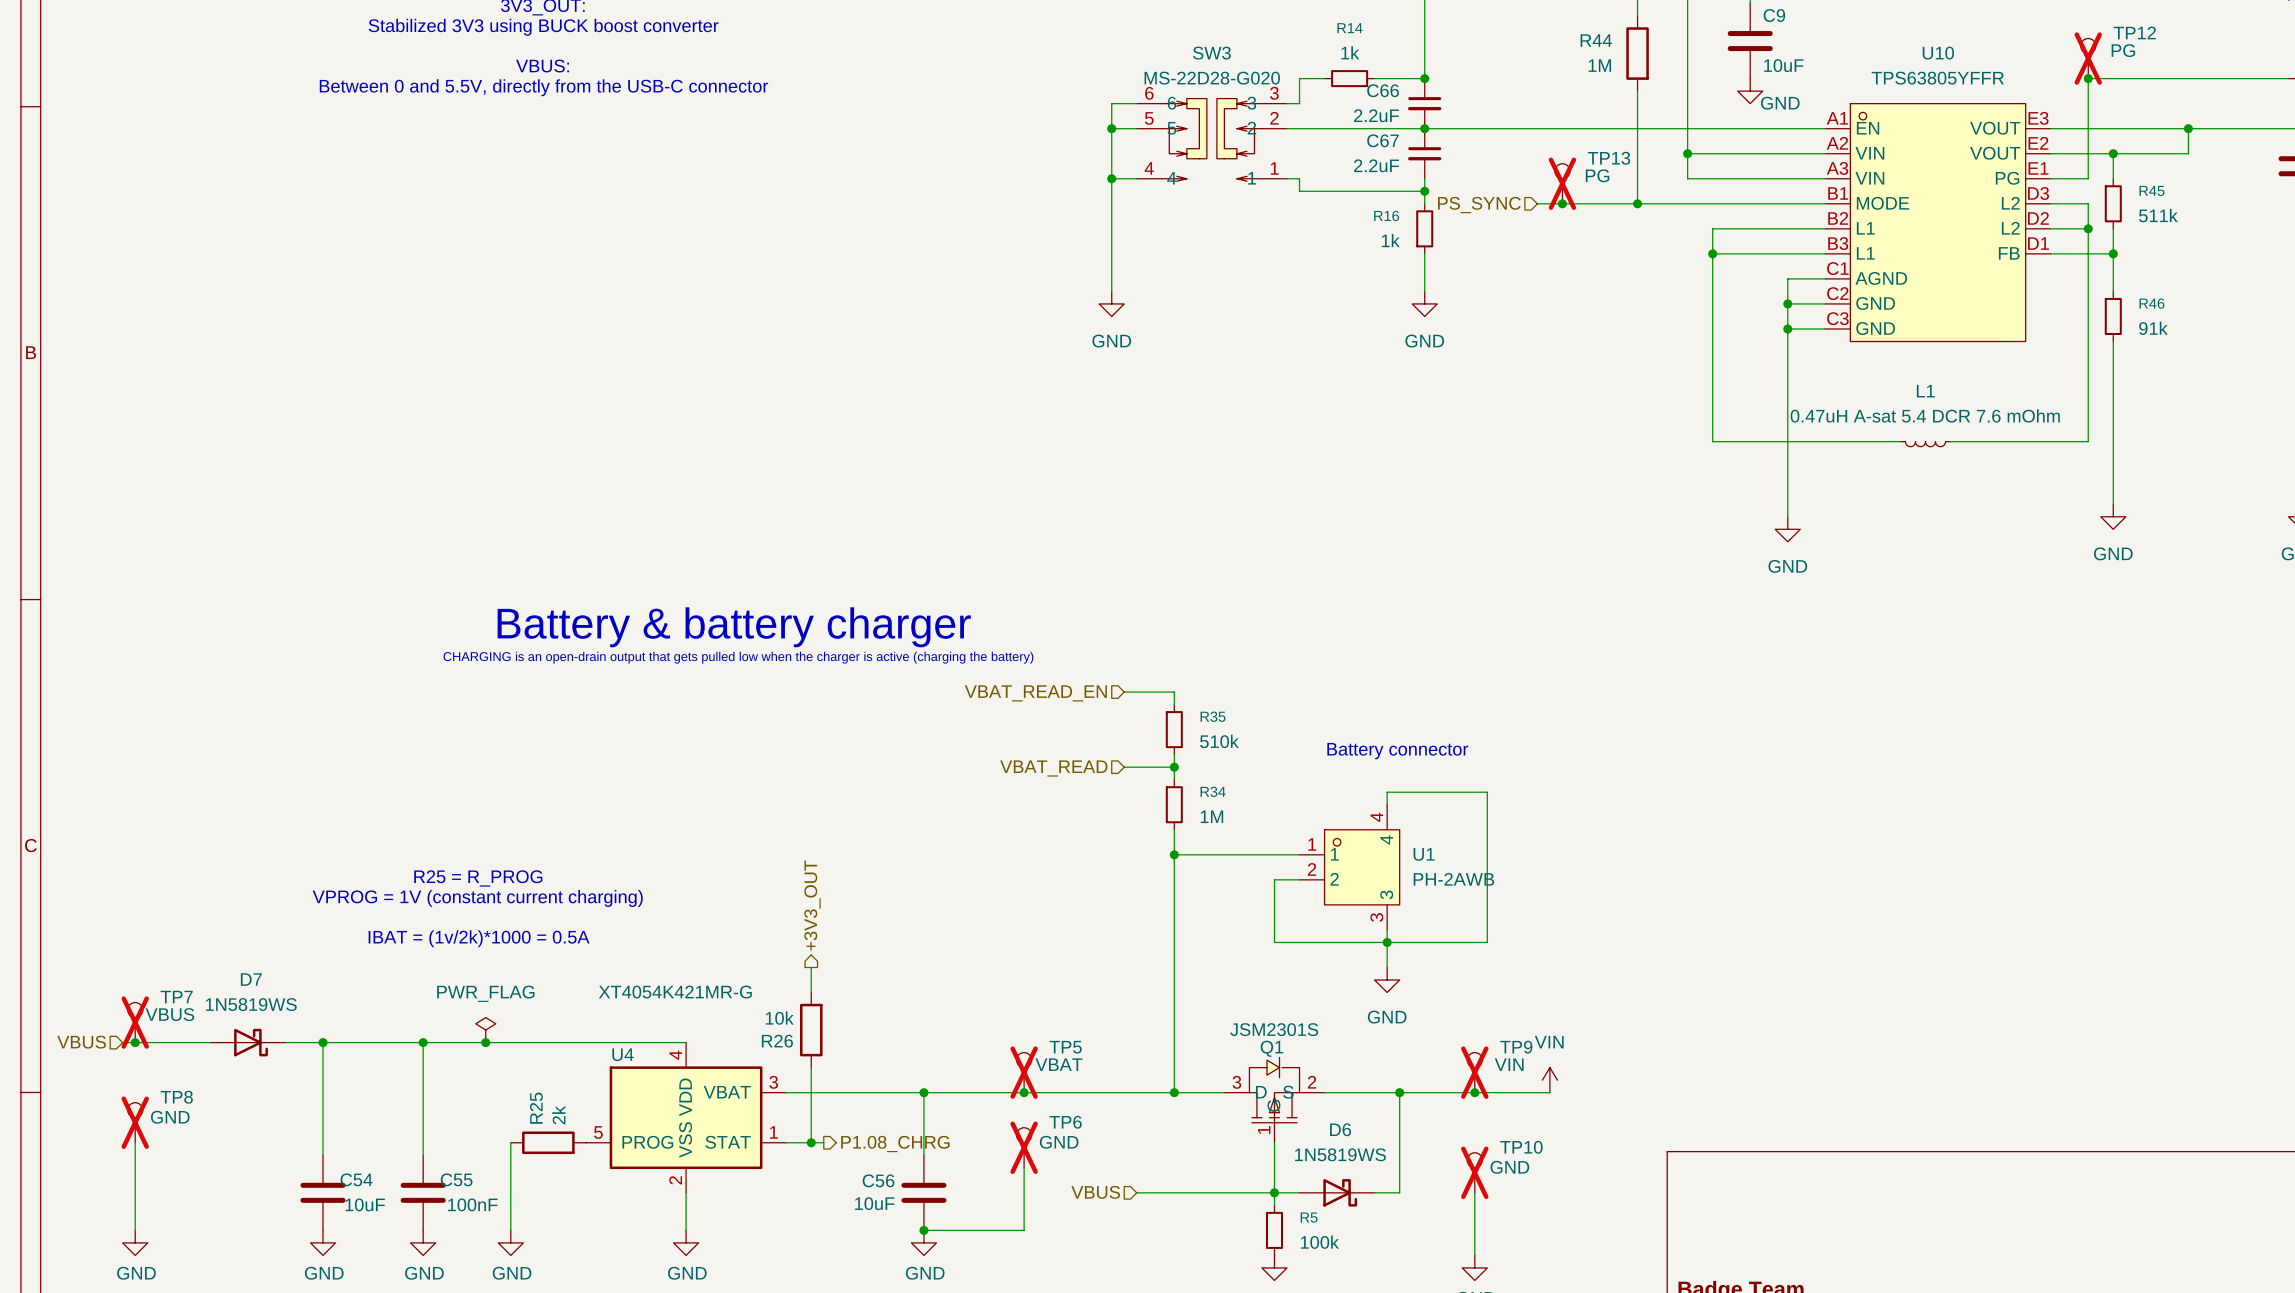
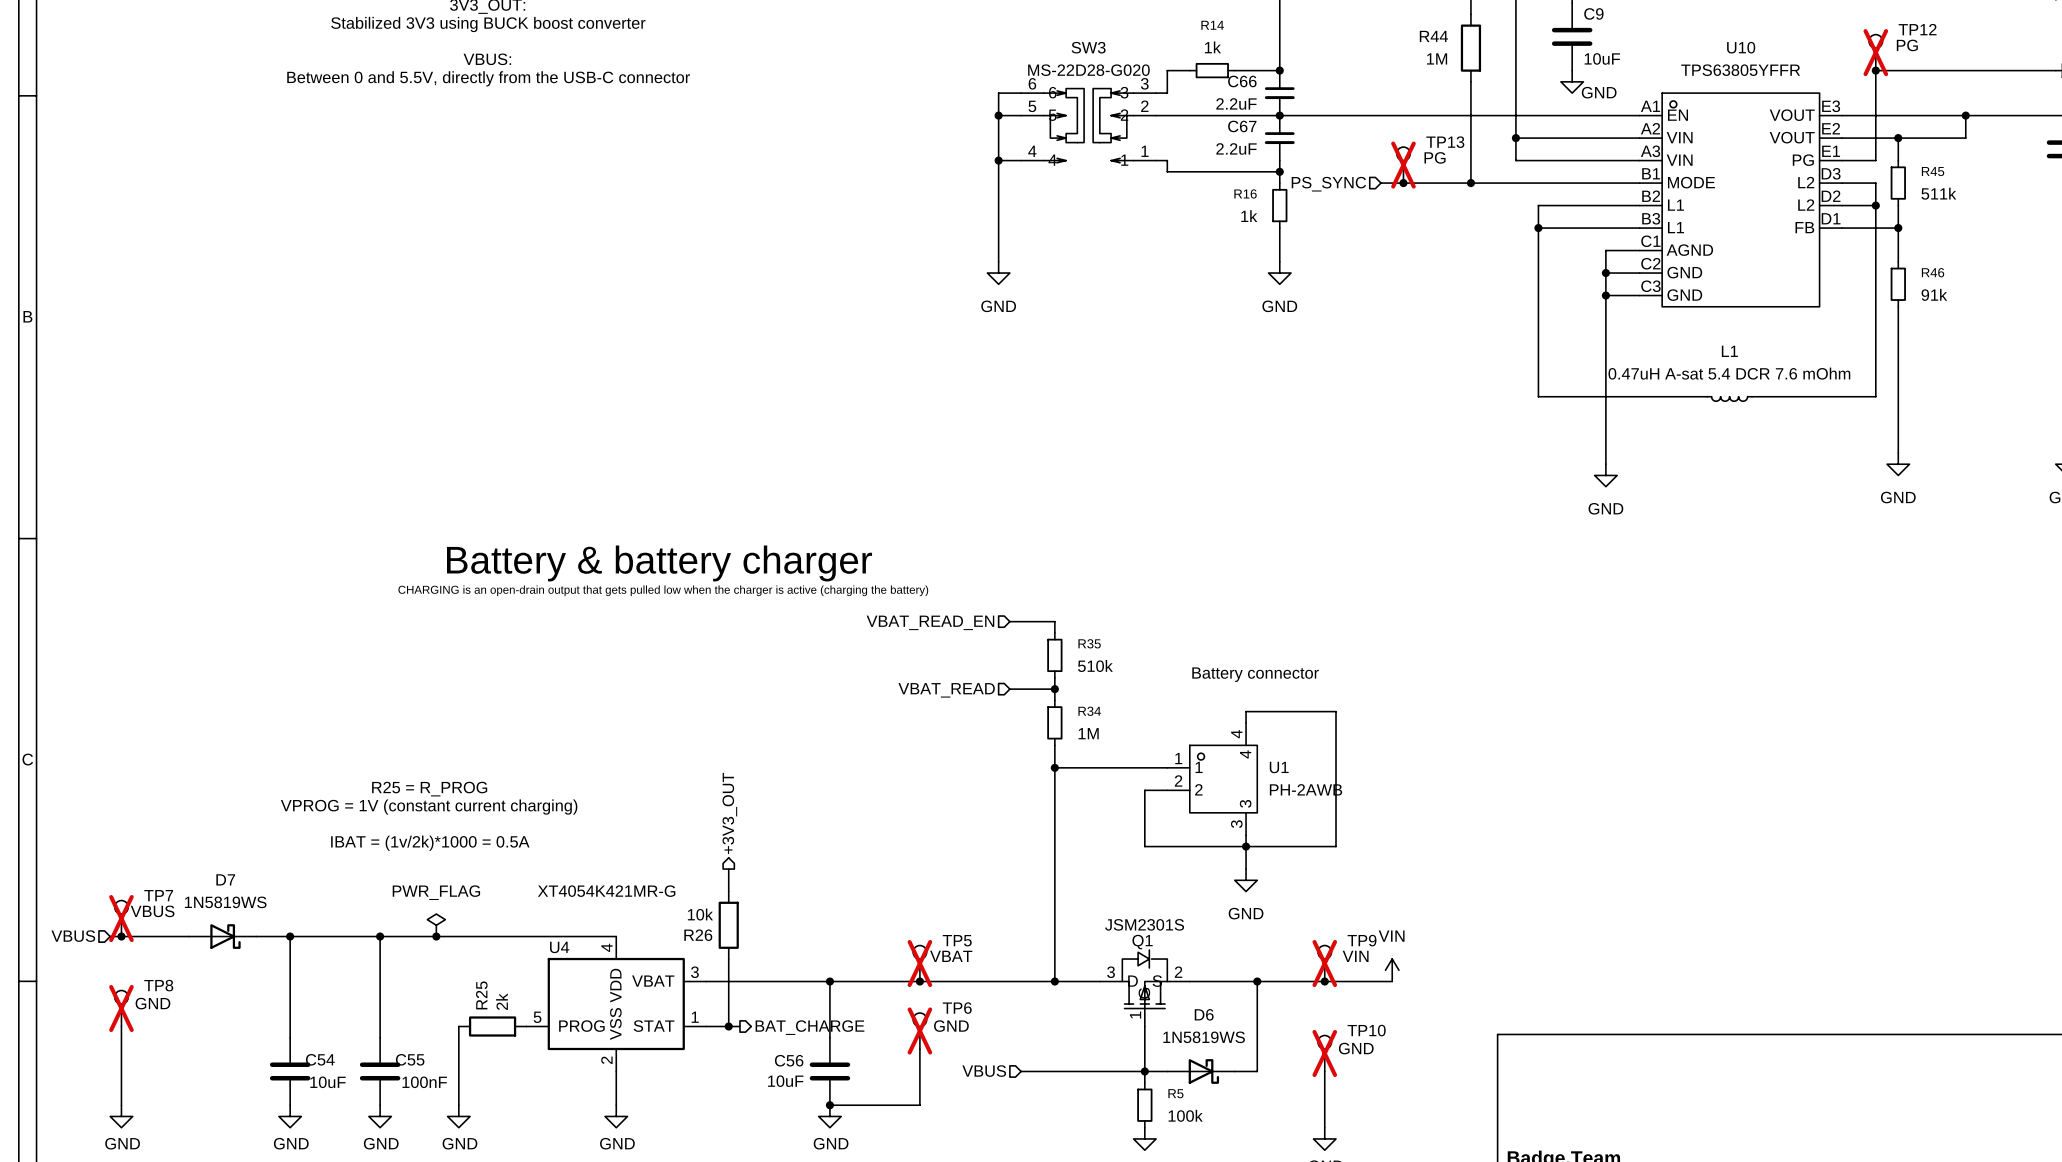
hierarchical label: P1.08_CHRG (895, 1144) -> BAT_CHARGE (809, 1027)

